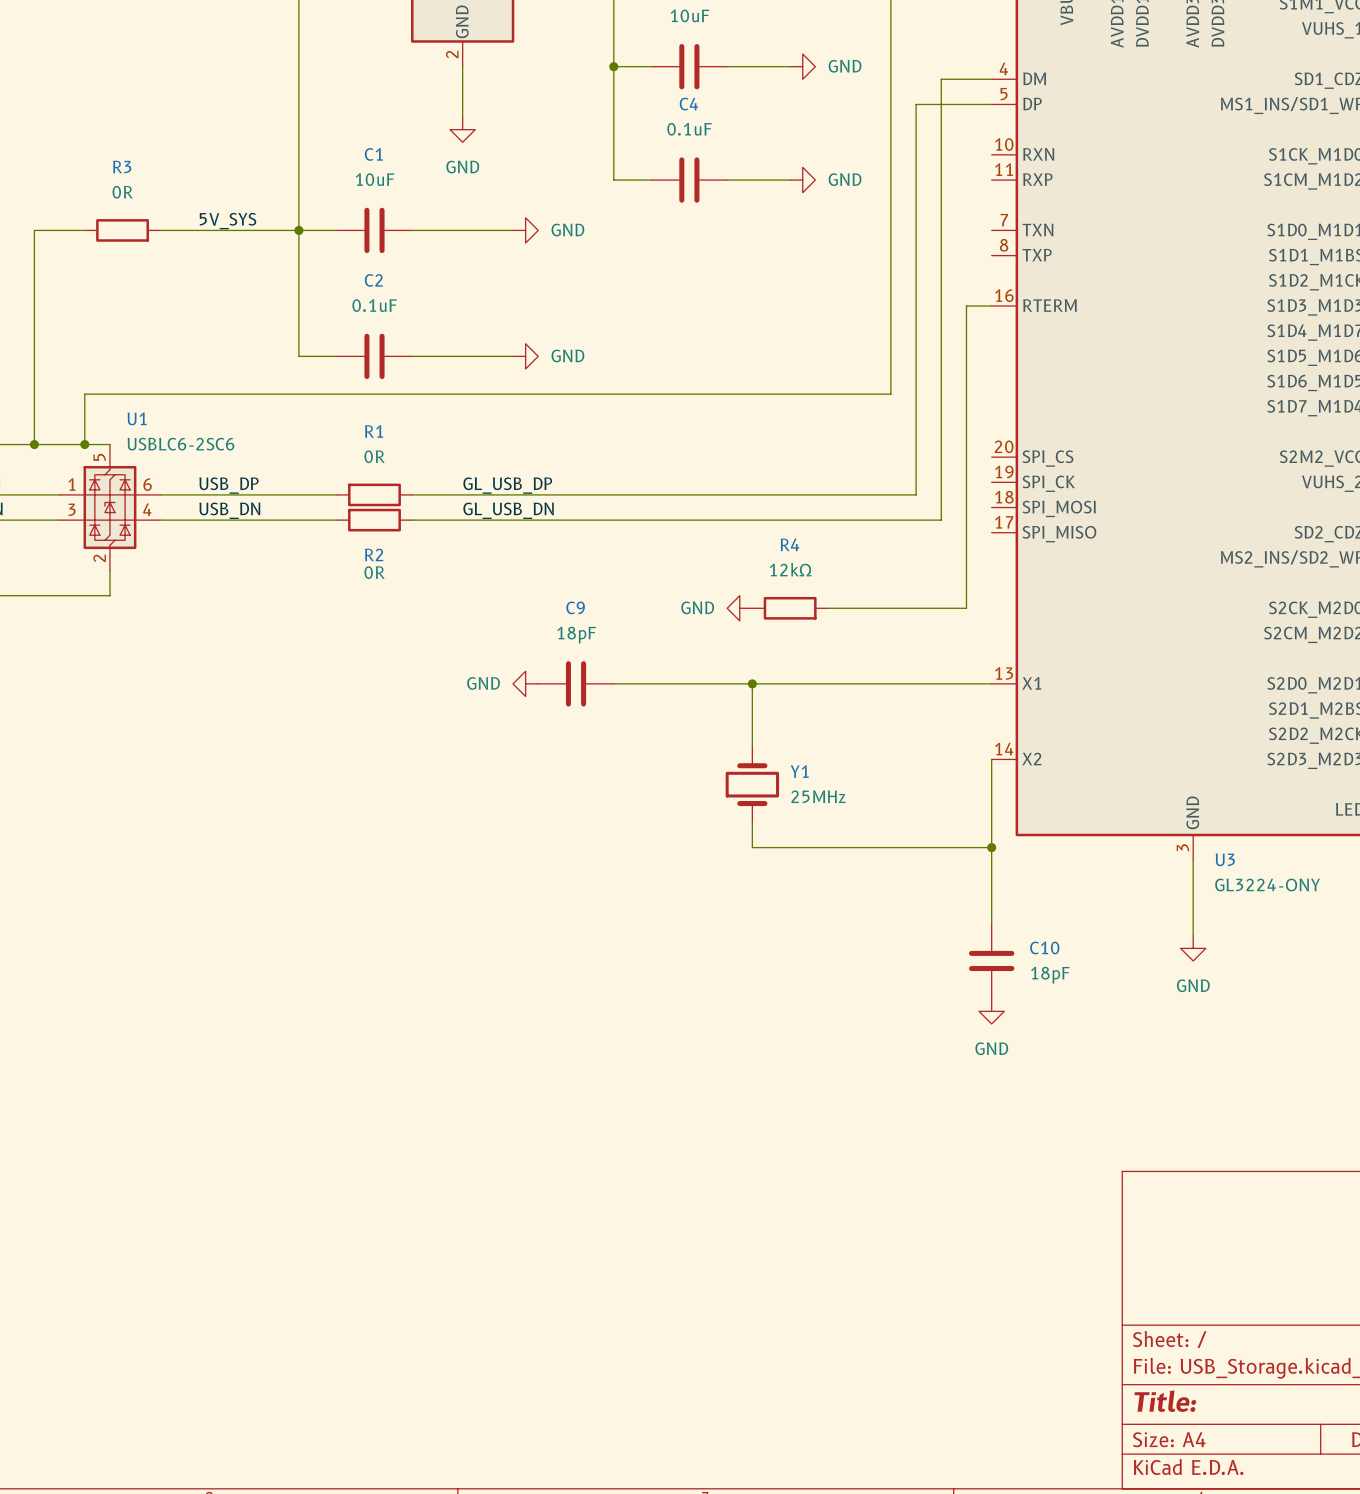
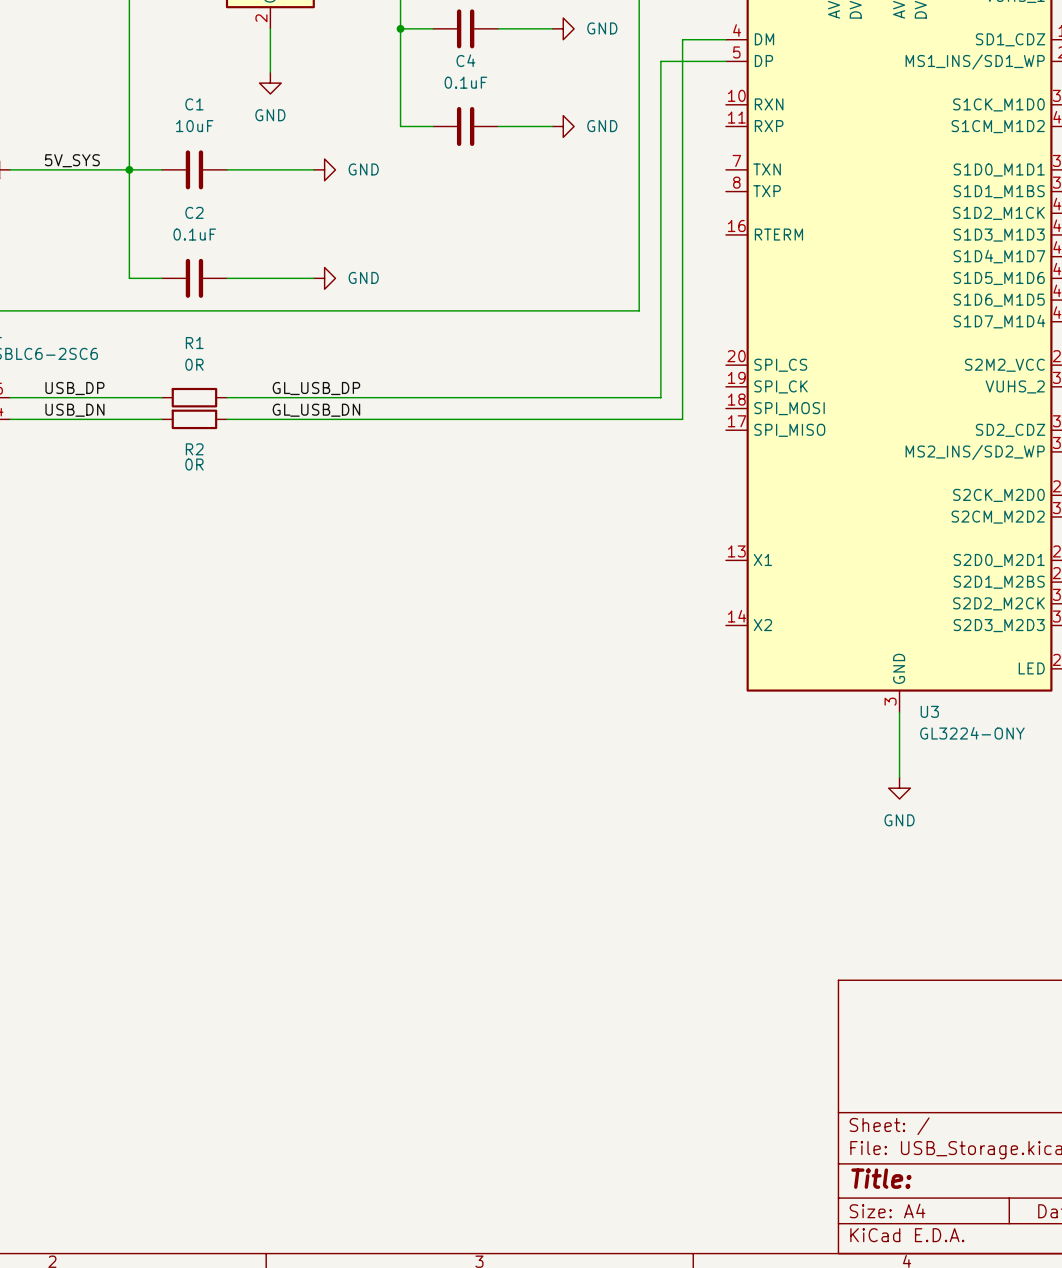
wire: (991, 305) (966, 305) (966, 608) (827, 608) -> none
power symbol: GND (739, 608) -> none
R4: 12kΩ (790, 608) -> none
power symbol: GND (525, 683) -> none
C9: 18pF (576, 683) -> none
wire: (613, 683) (991, 683) -> none
wire: (752, 683) (752, 746) -> none
junction: (752, 683) -> none
wire: (991, 759) (991, 923) -> none
Y1: 25MHz (752, 784) -> none
wire: (752, 822) (752, 847) (991, 847) -> none
junction: (991, 847) -> none
C10: 18pF (991, 960) -> none
power symbol: GND (991, 1011) -> none

